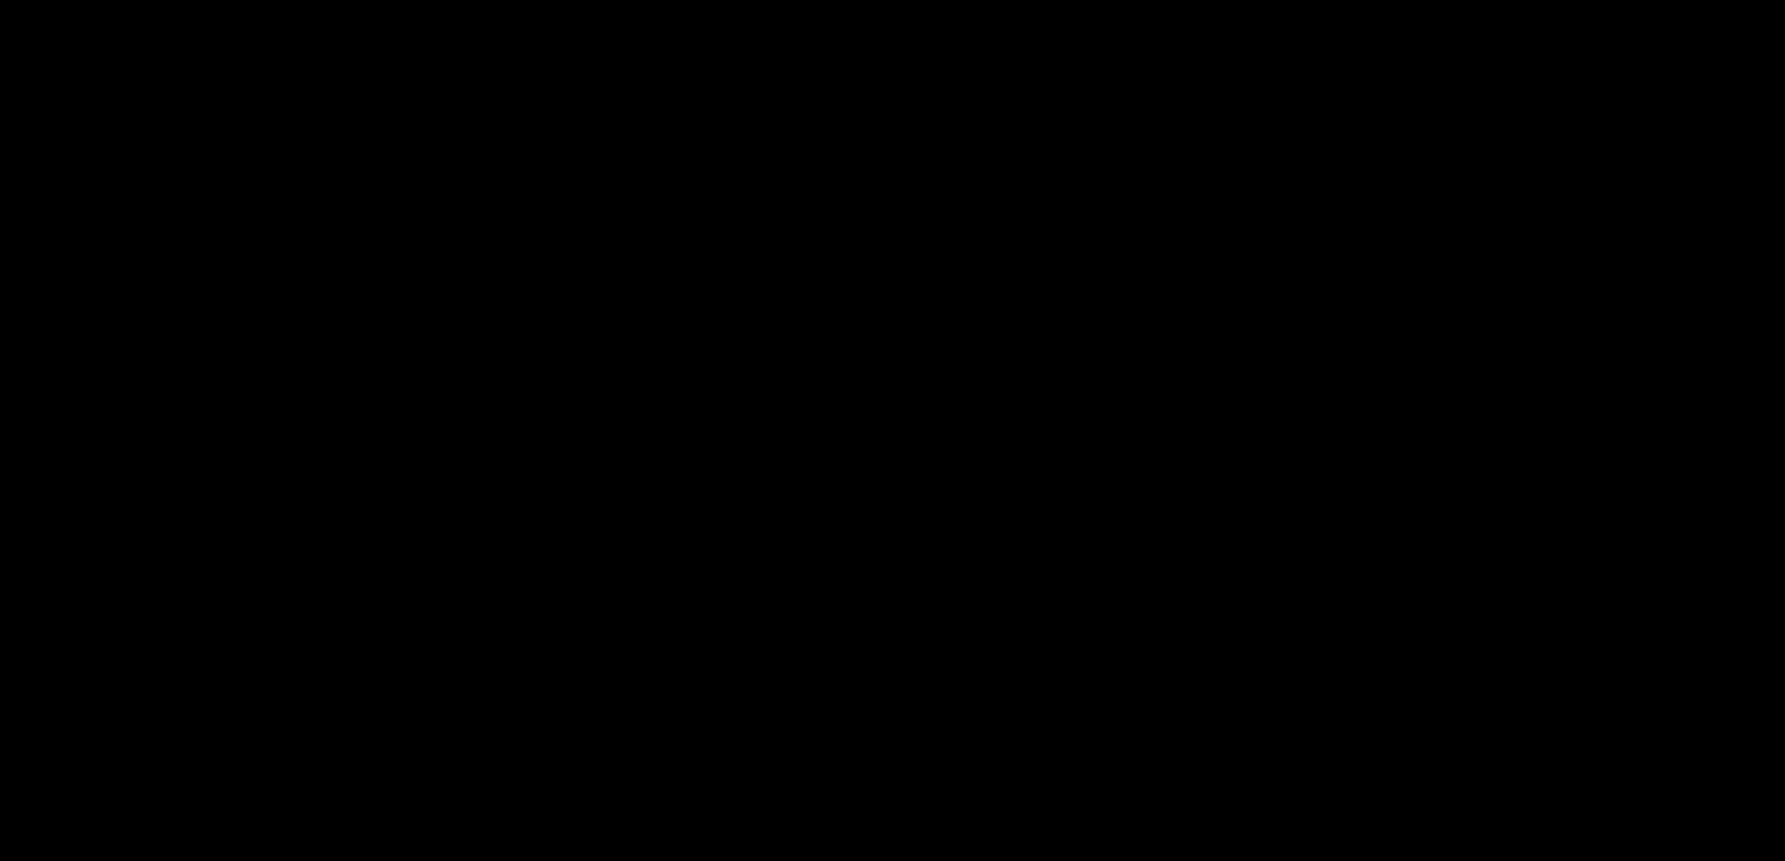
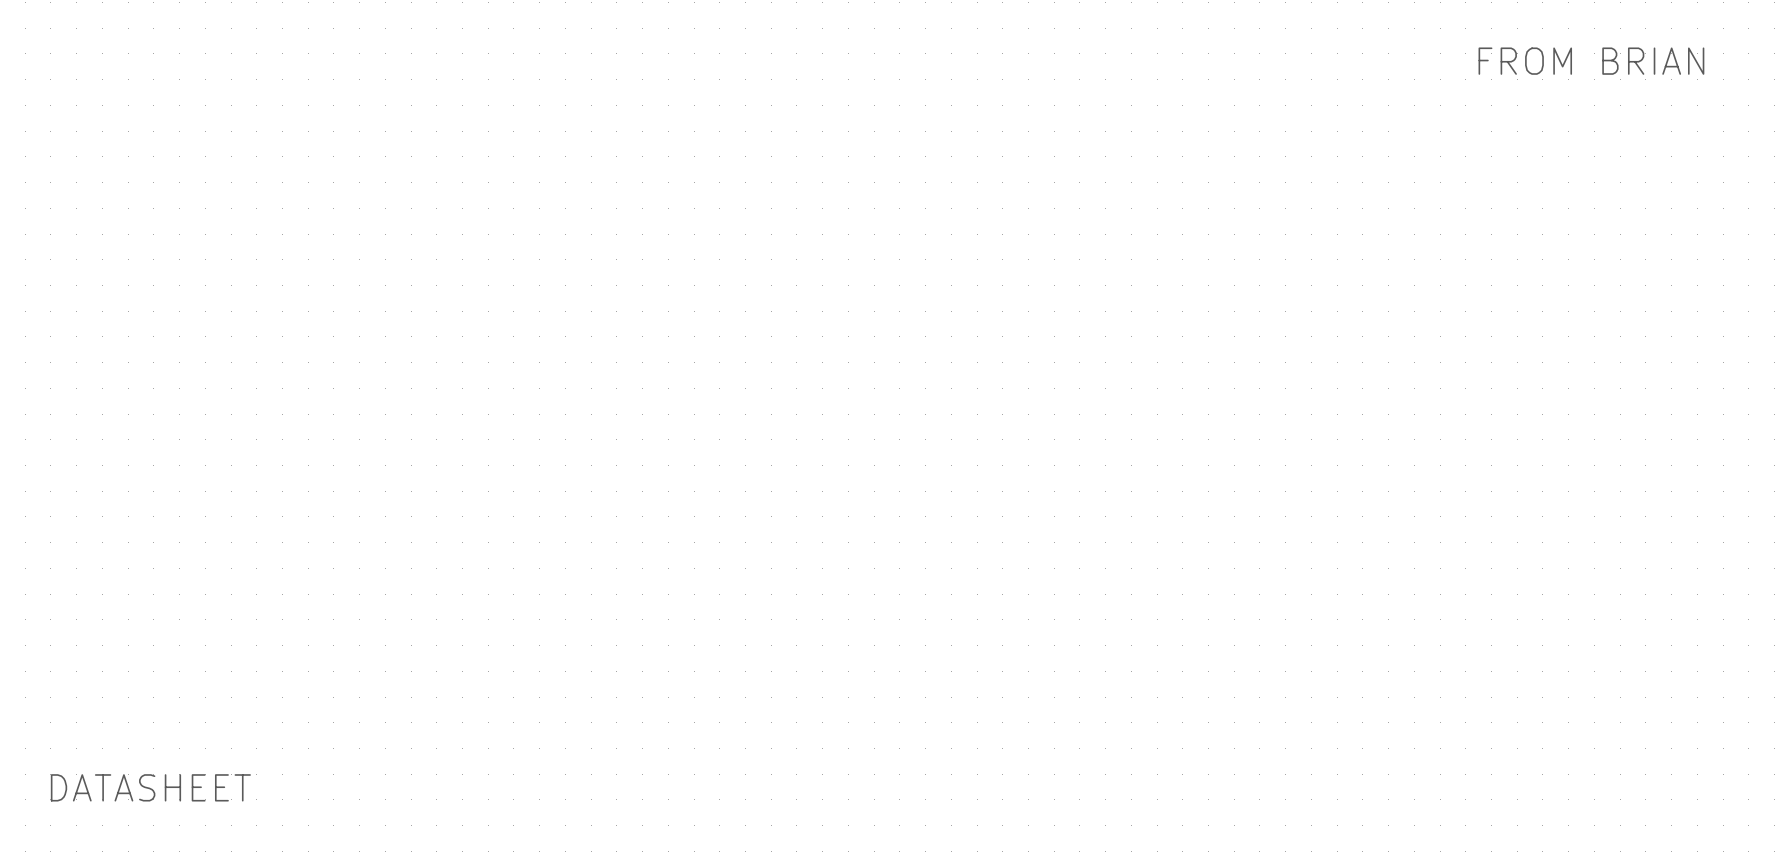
text: none -> FROM BRIAN (1591, 61)
text: none -> DATASHEET (150, 787)

